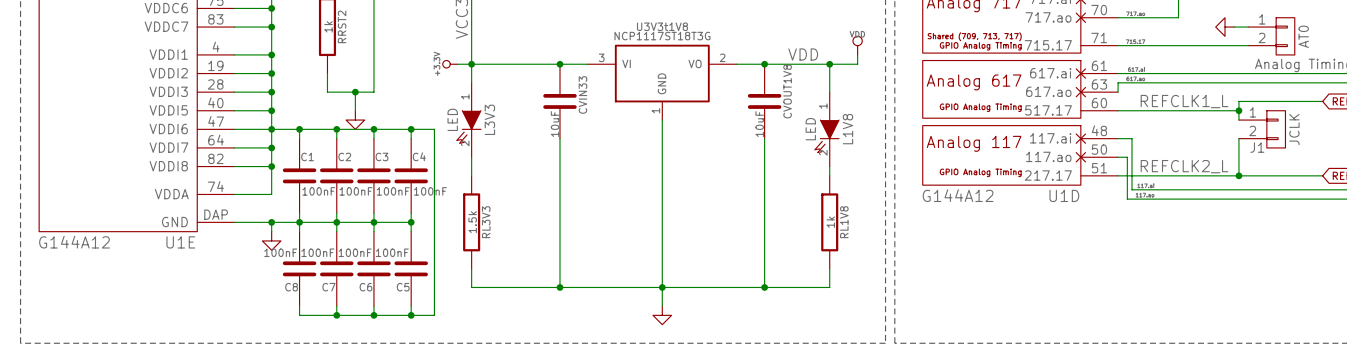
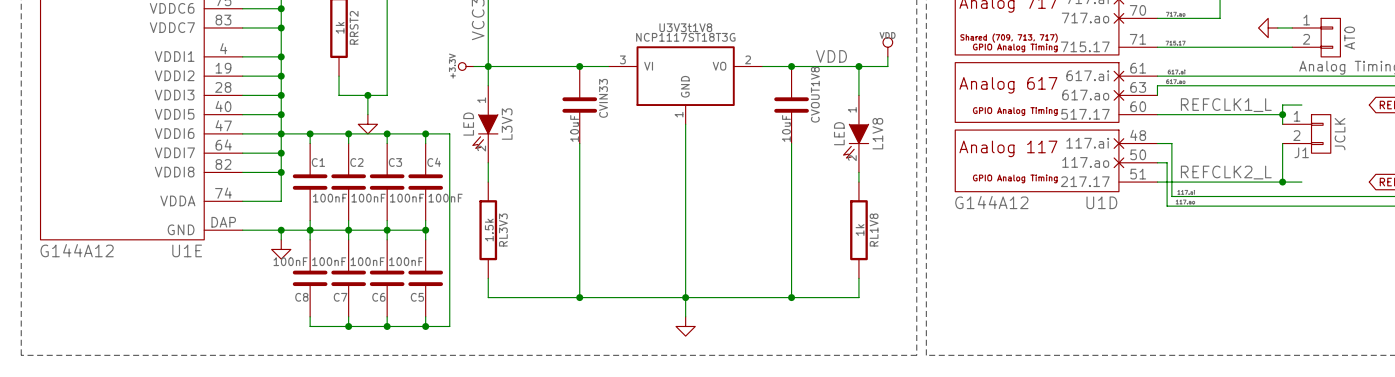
wire: (1257, 101) (1322, 101) -> none
wire: (1257, 175) (1322, 175) -> none

